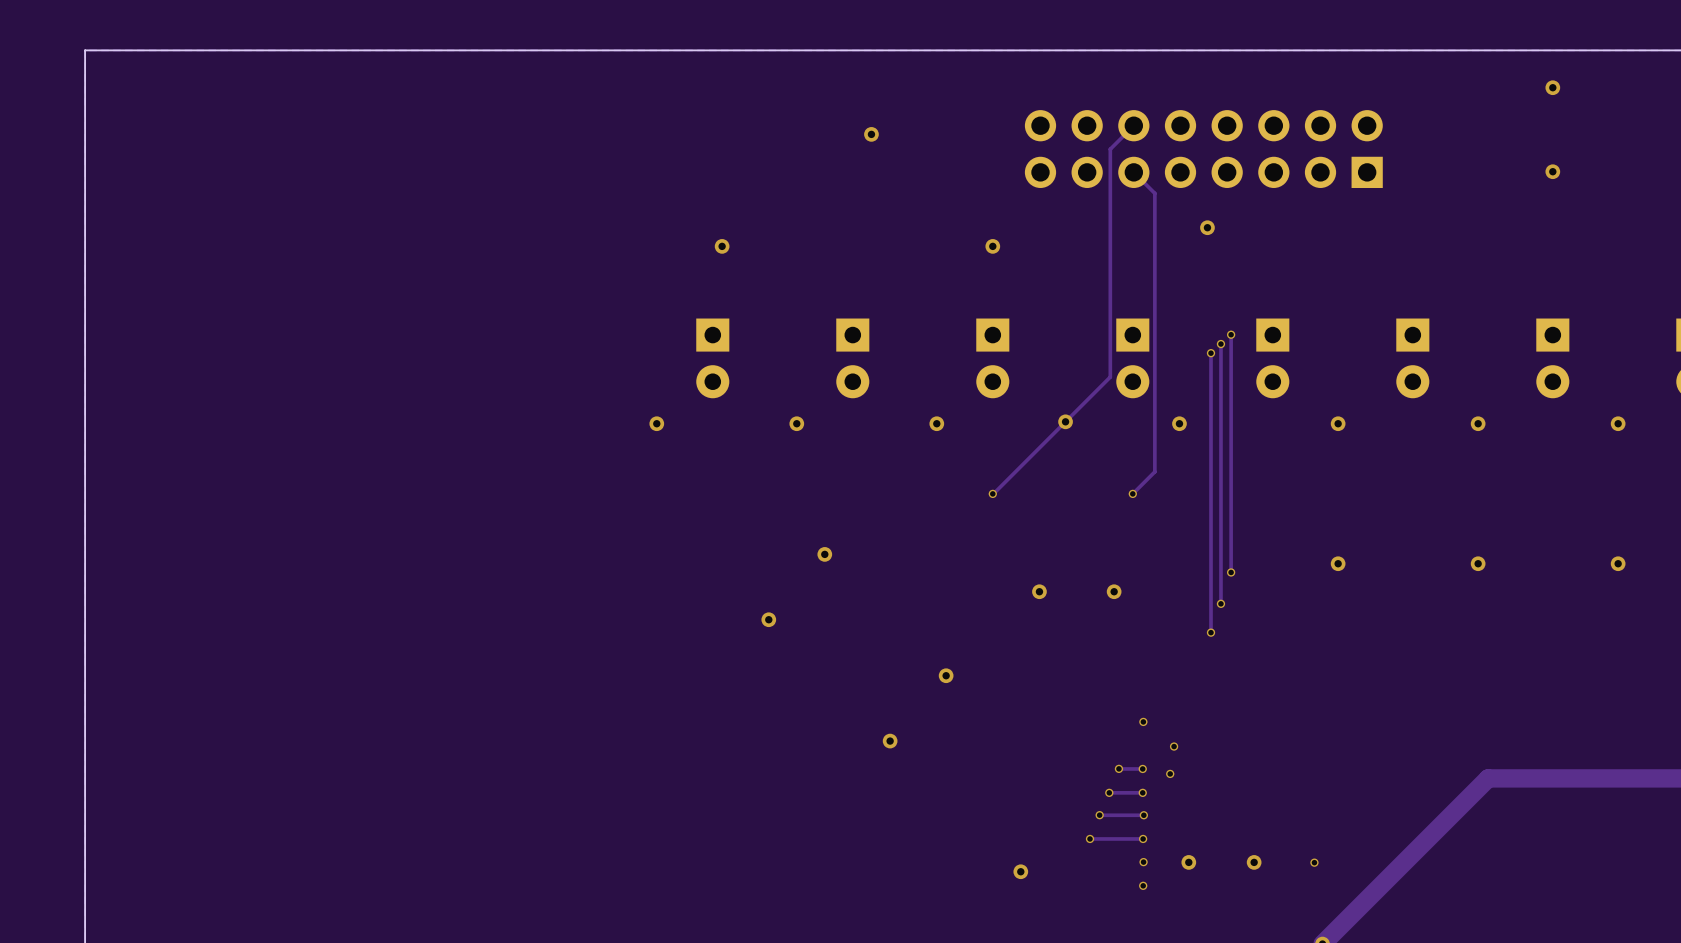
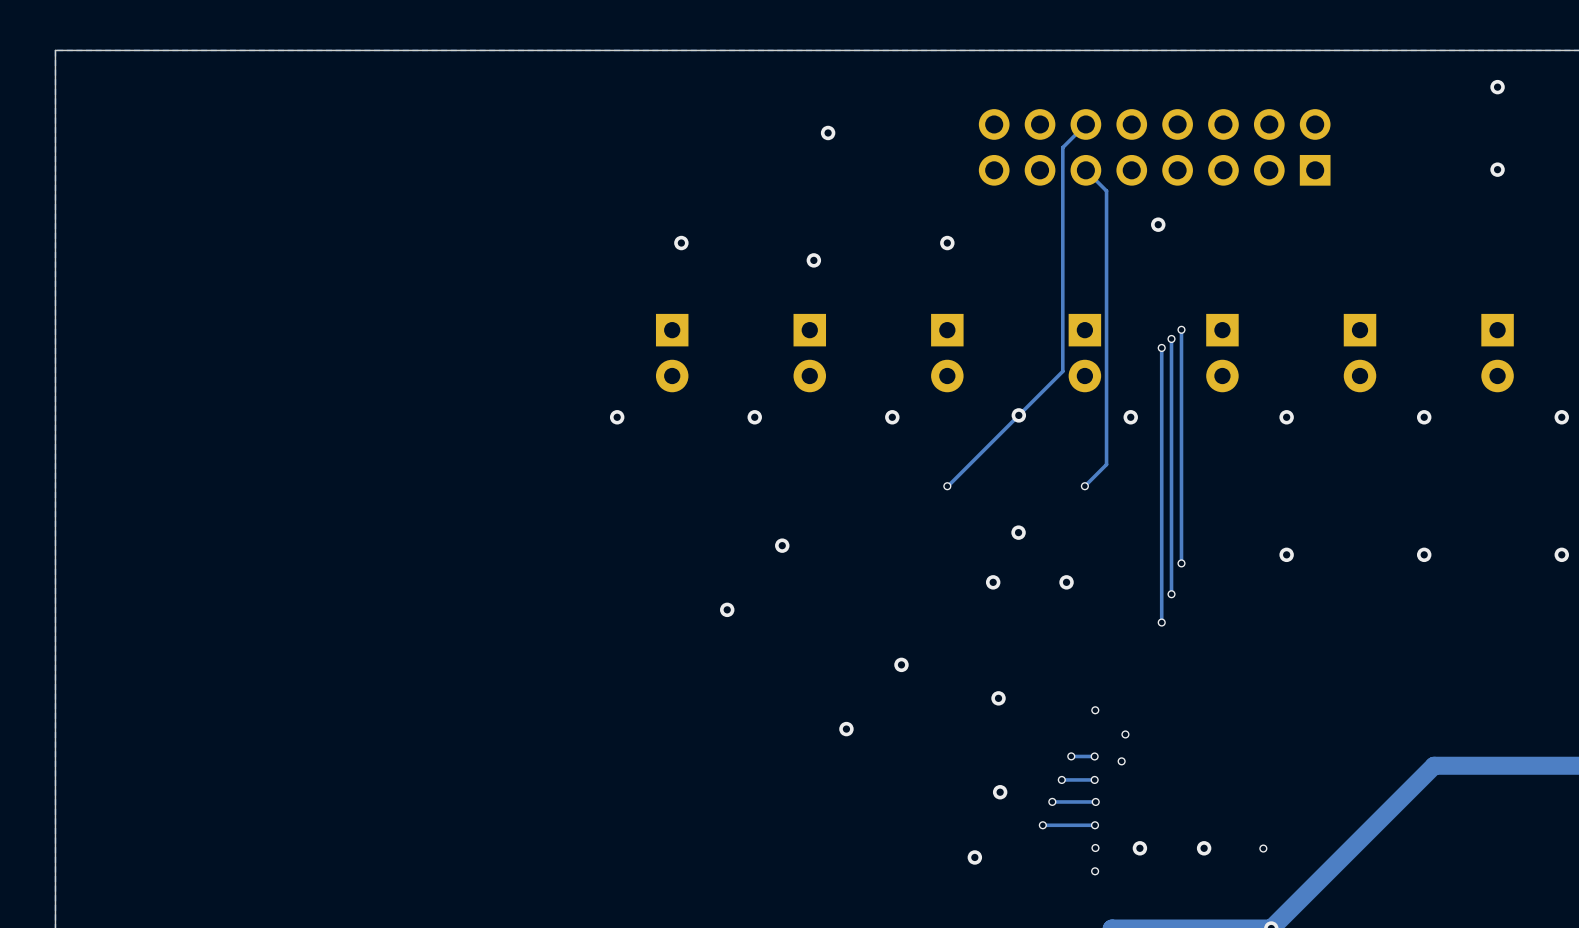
via: none -> (813, 260)
via: none -> (1018, 532)
via: none -> (998, 698)
via: none -> (1000, 792)

